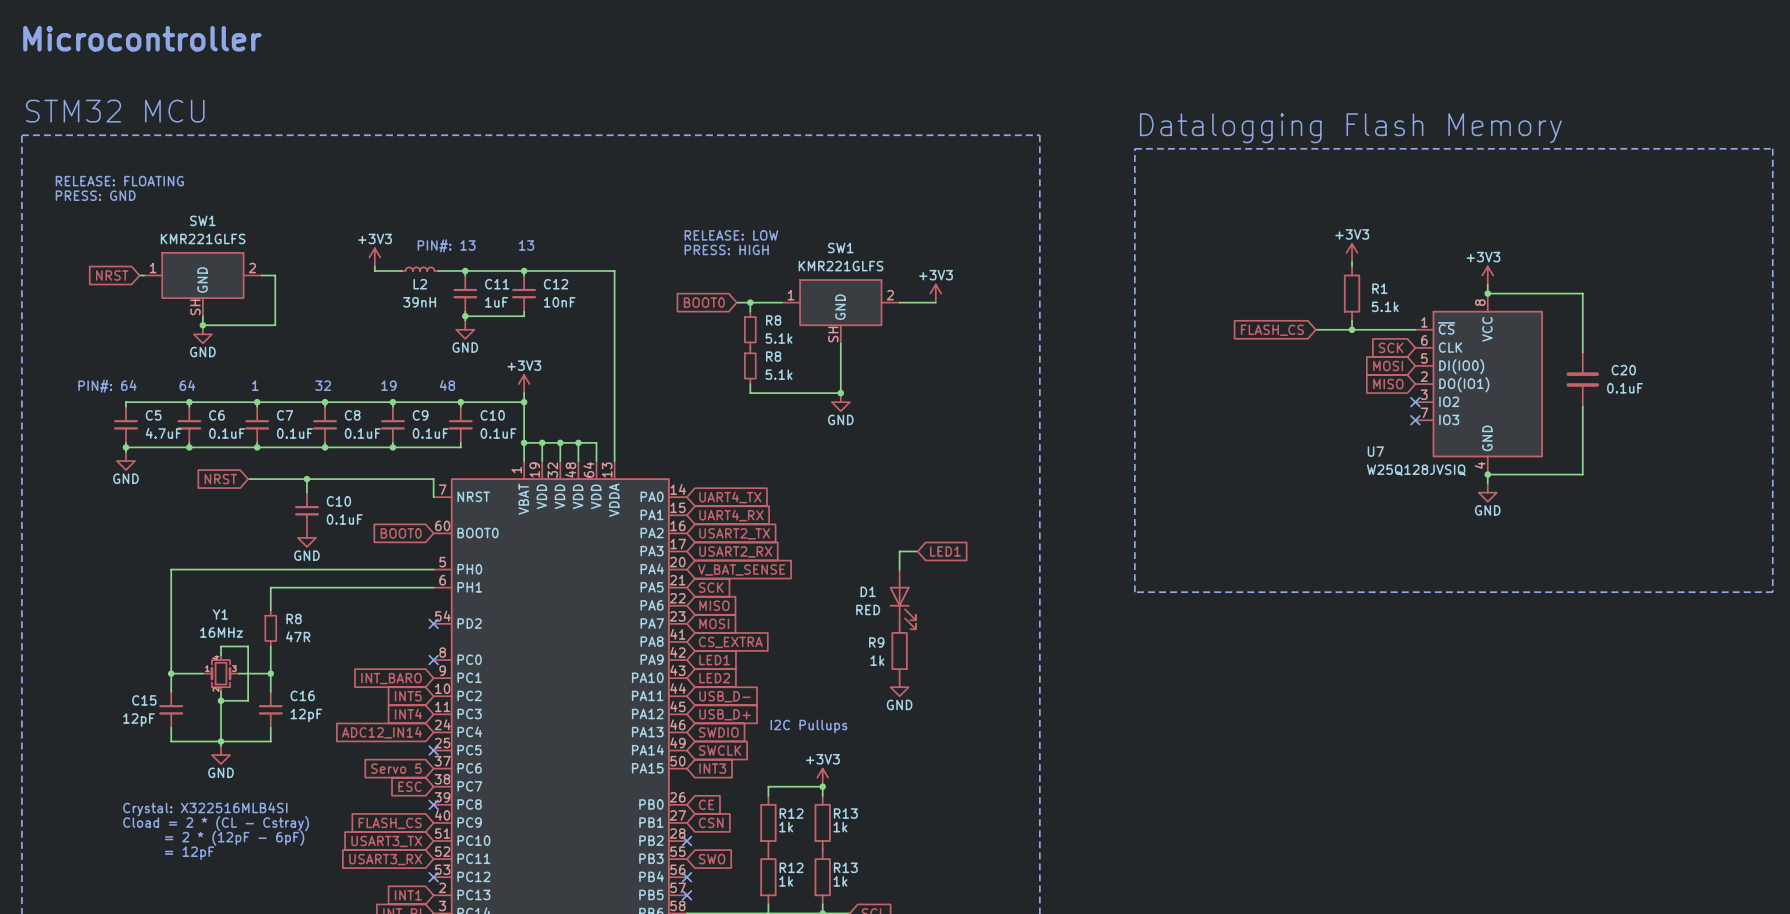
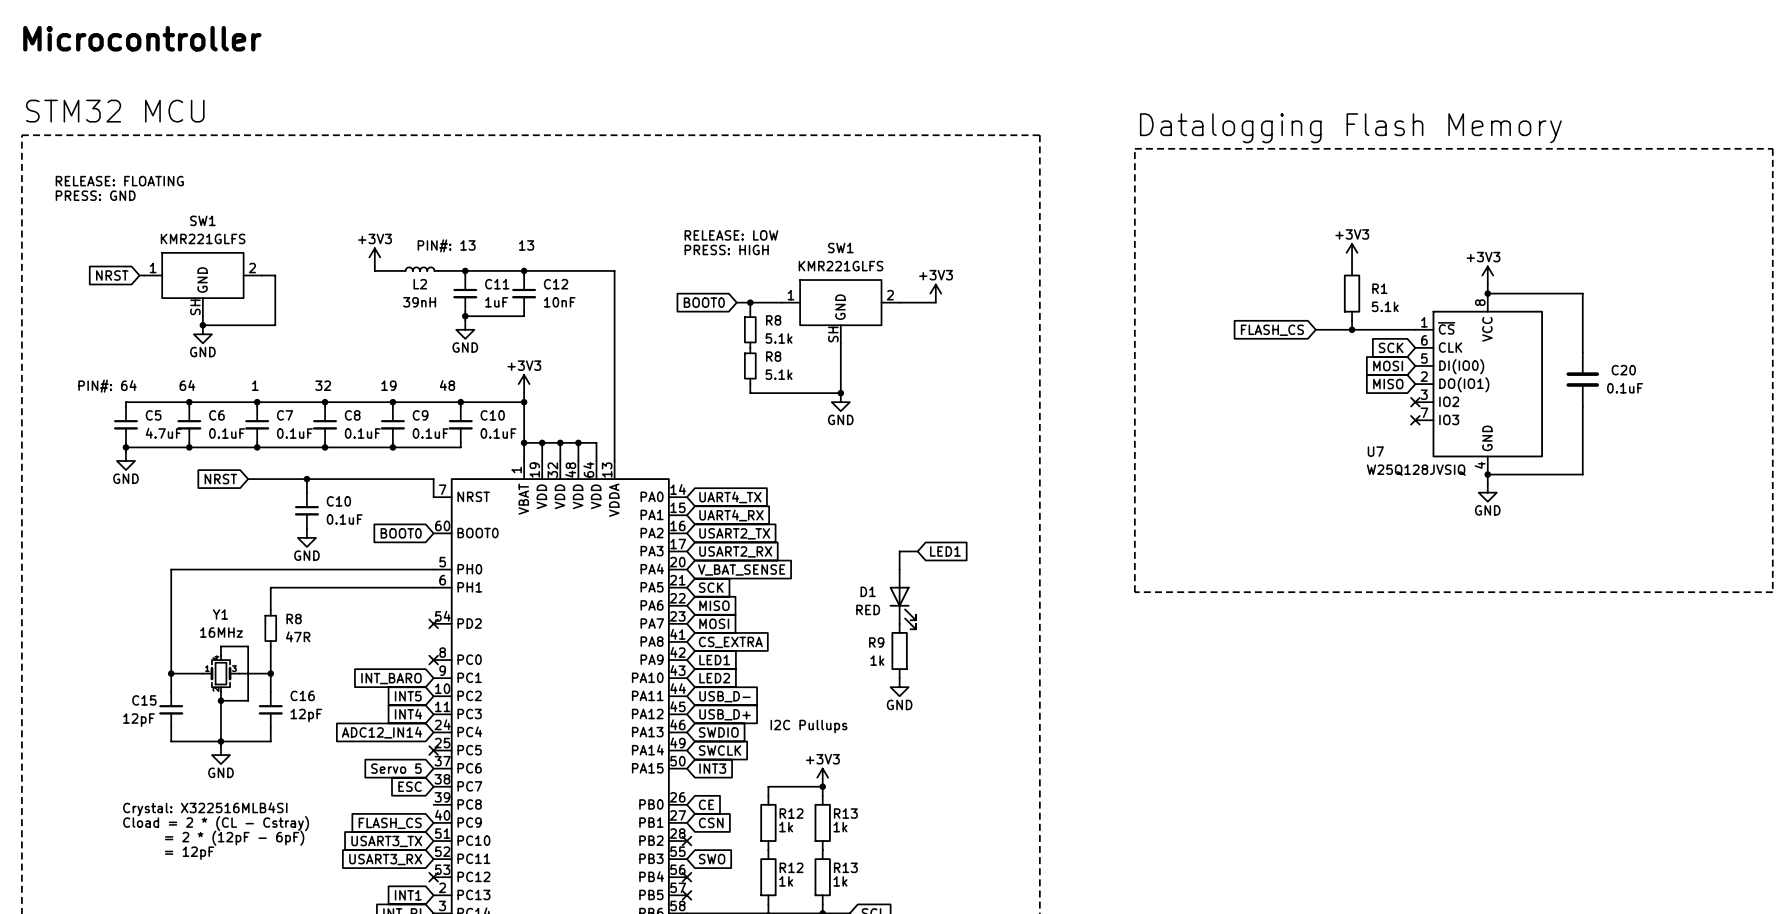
no-connect mark: (433, 804) -> none

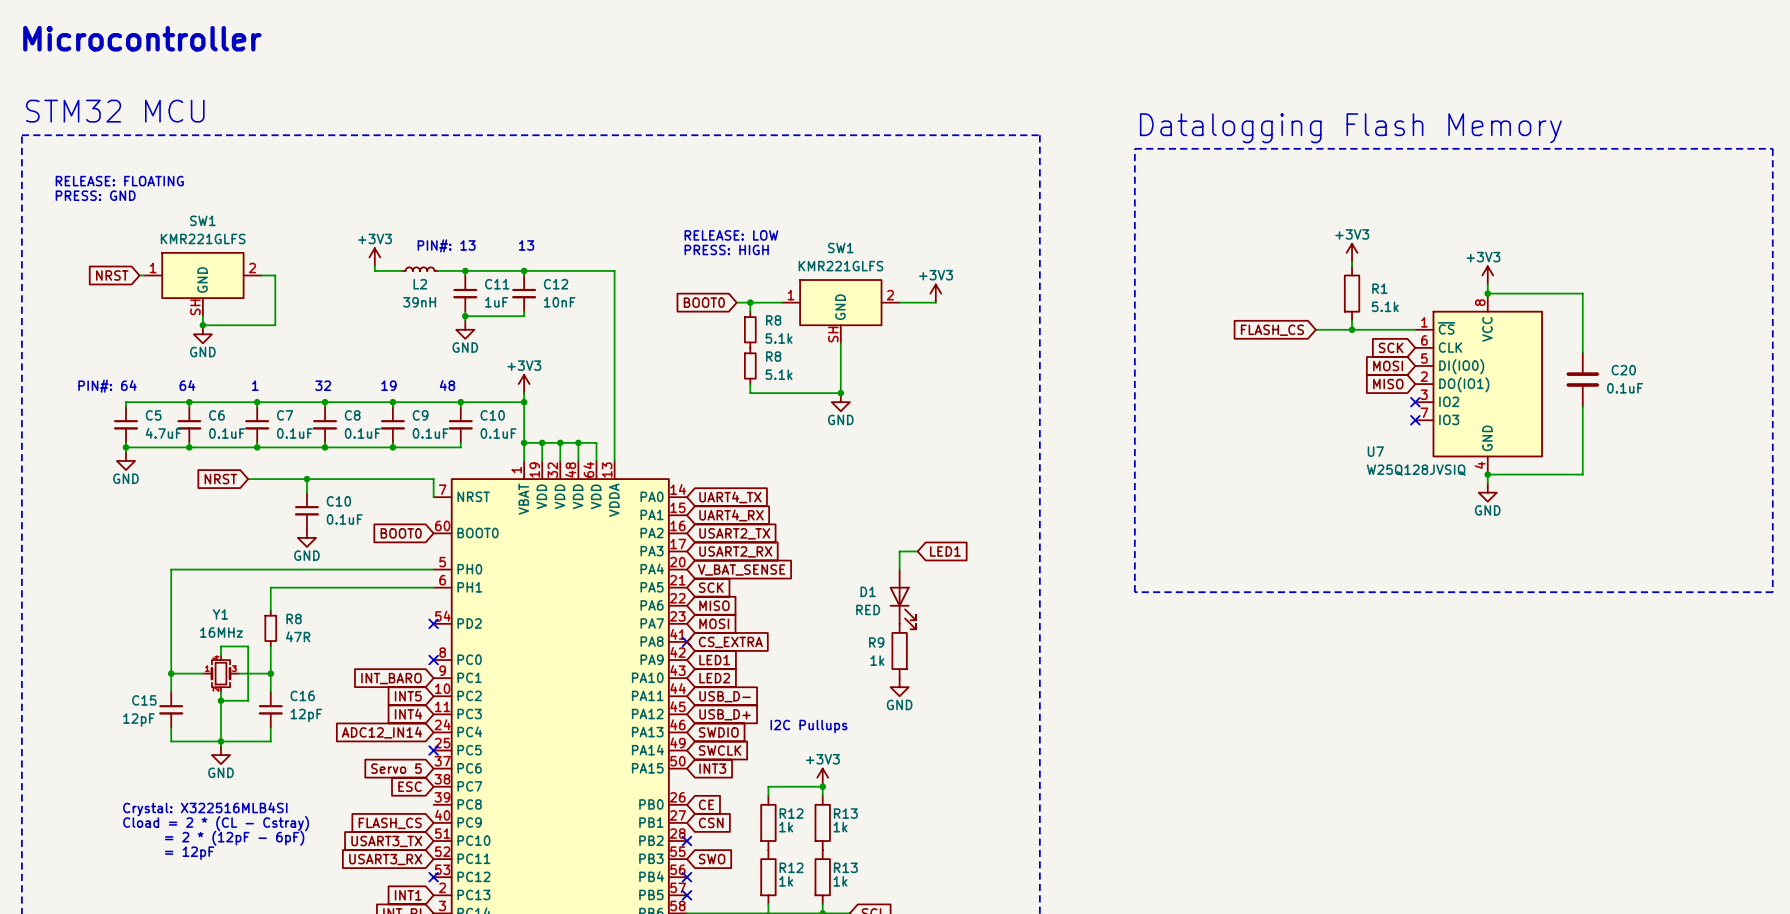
no-connect mark: none -> (686, 641)

